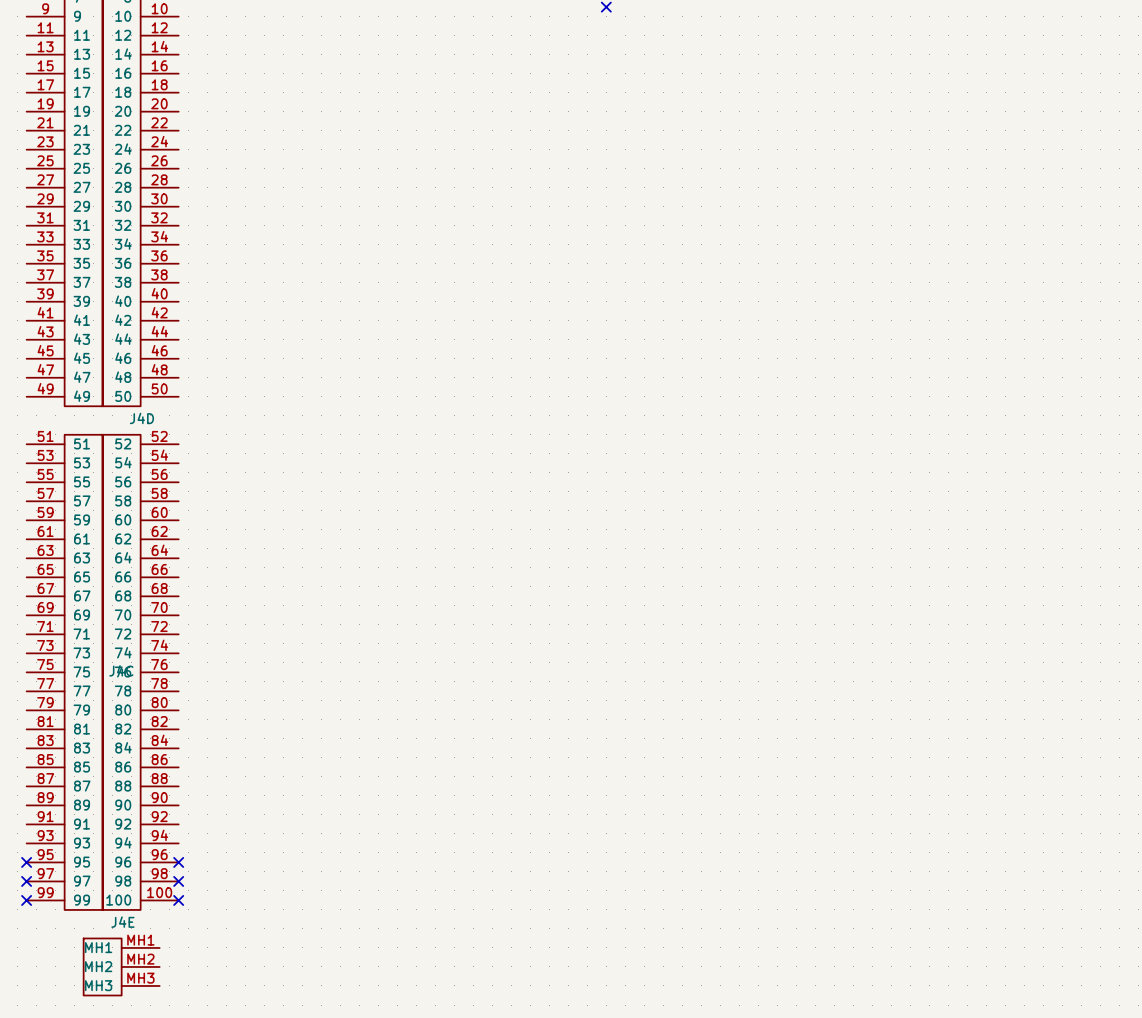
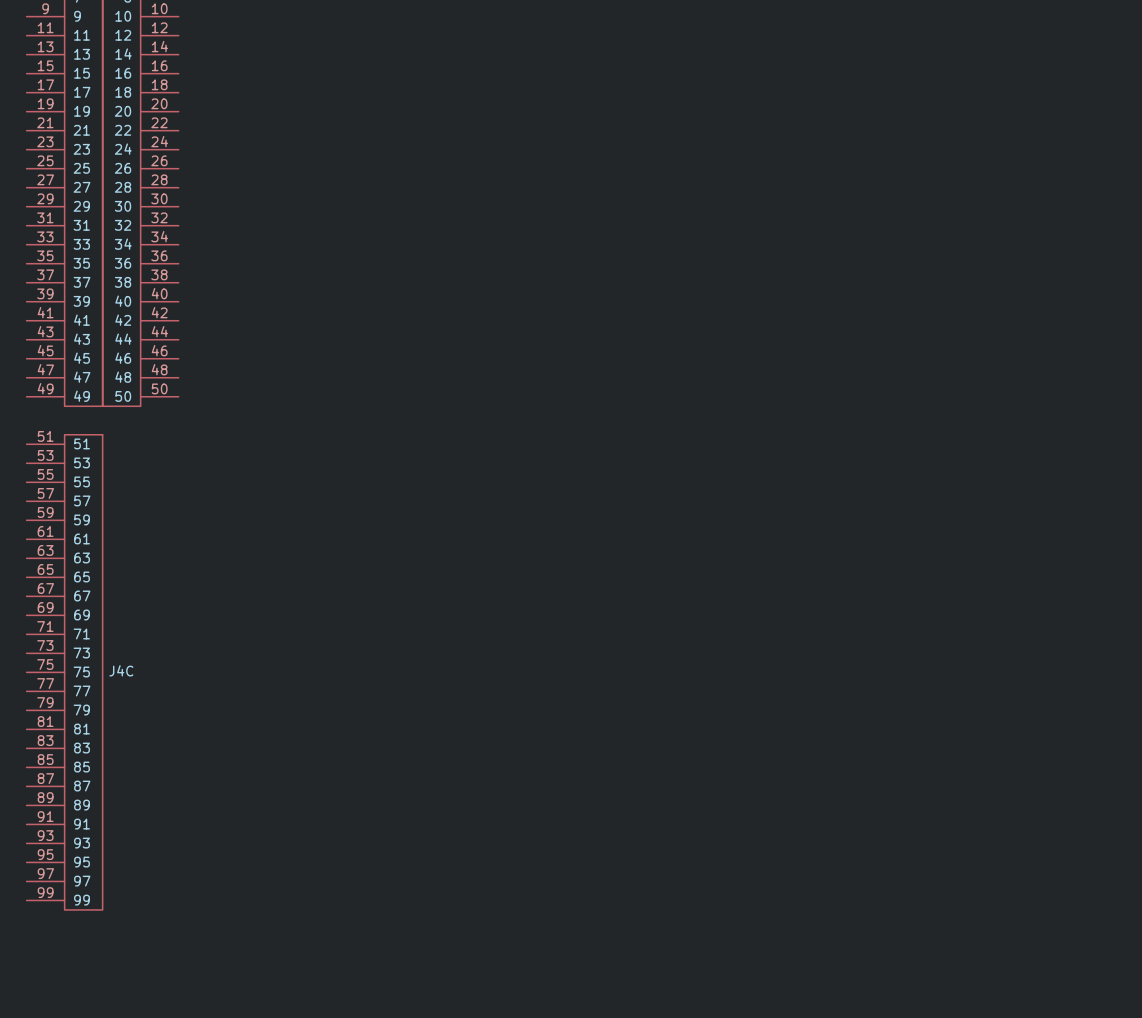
no-connect mark: (606, 7) -> none
J4D: (140, 672) -> none
no-connect mark: (26, 862) -> none
no-connect mark: (178, 862) -> none
no-connect mark: (26, 881) -> none
no-connect mark: (178, 881) -> none
no-connect mark: (26, 900) -> none
no-connect mark: (178, 900) -> none
J4E: (121, 966) -> none

